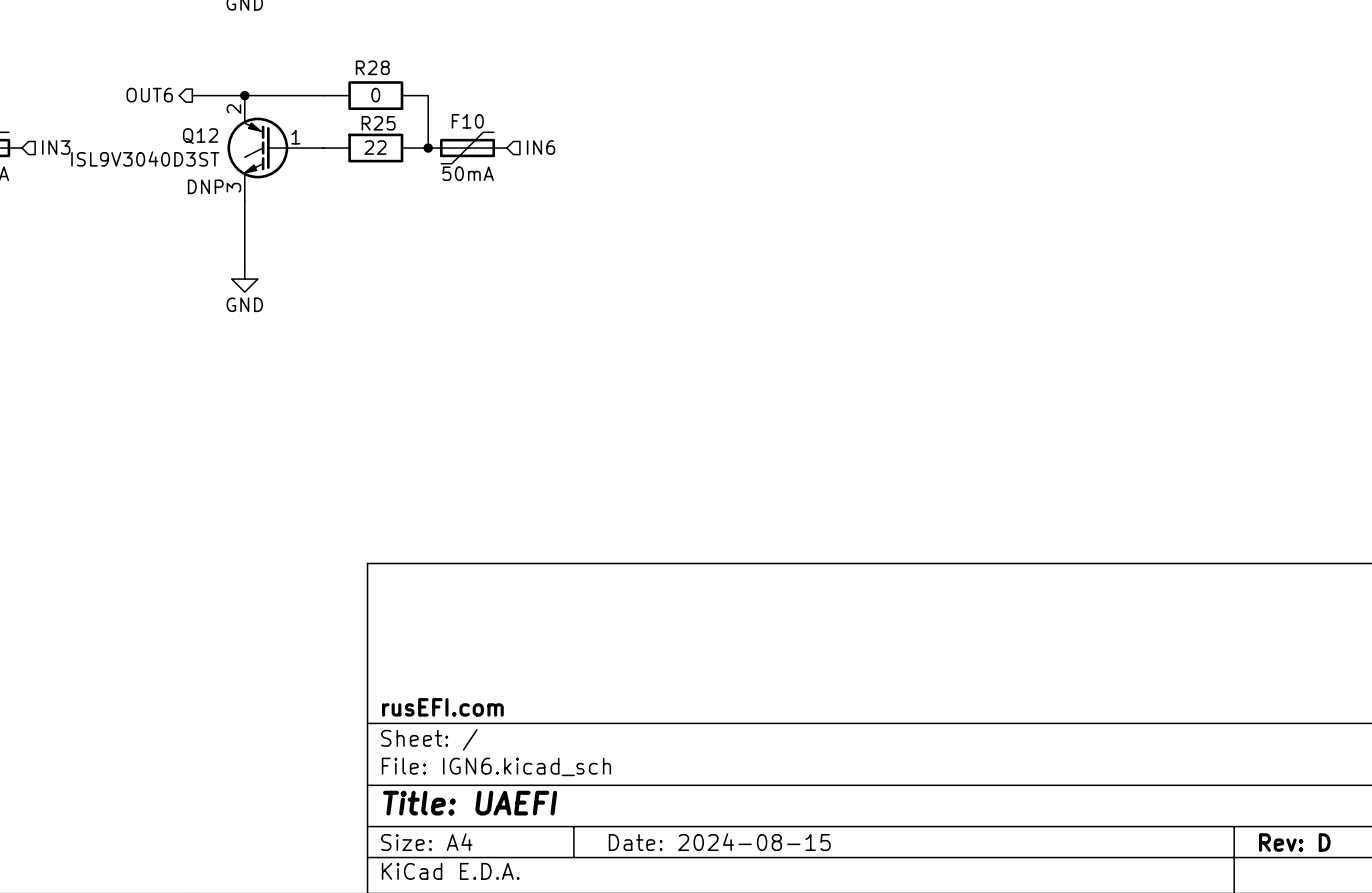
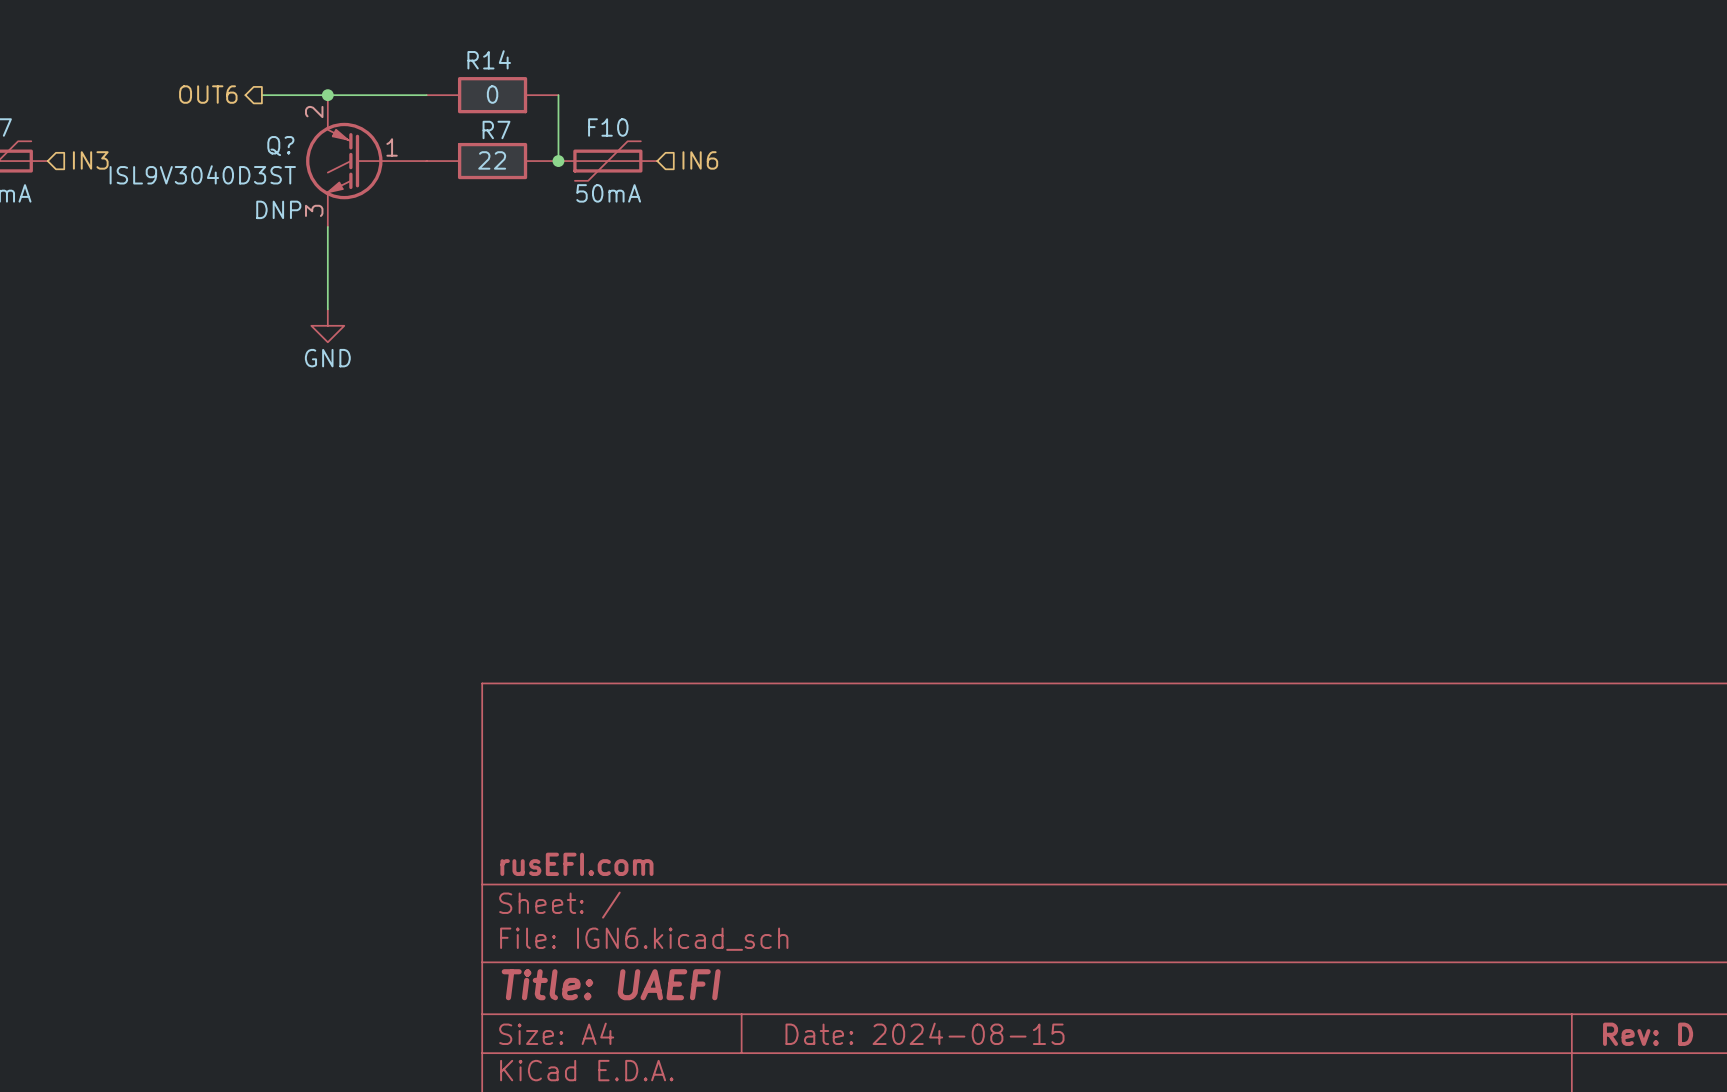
R28 name: R28 (372, 67) -> R14 (489, 59)
R25 name: R25 (378, 123) -> R7 (496, 129)
Q12 name: Q12 (200, 136) -> Q? (280, 146)

